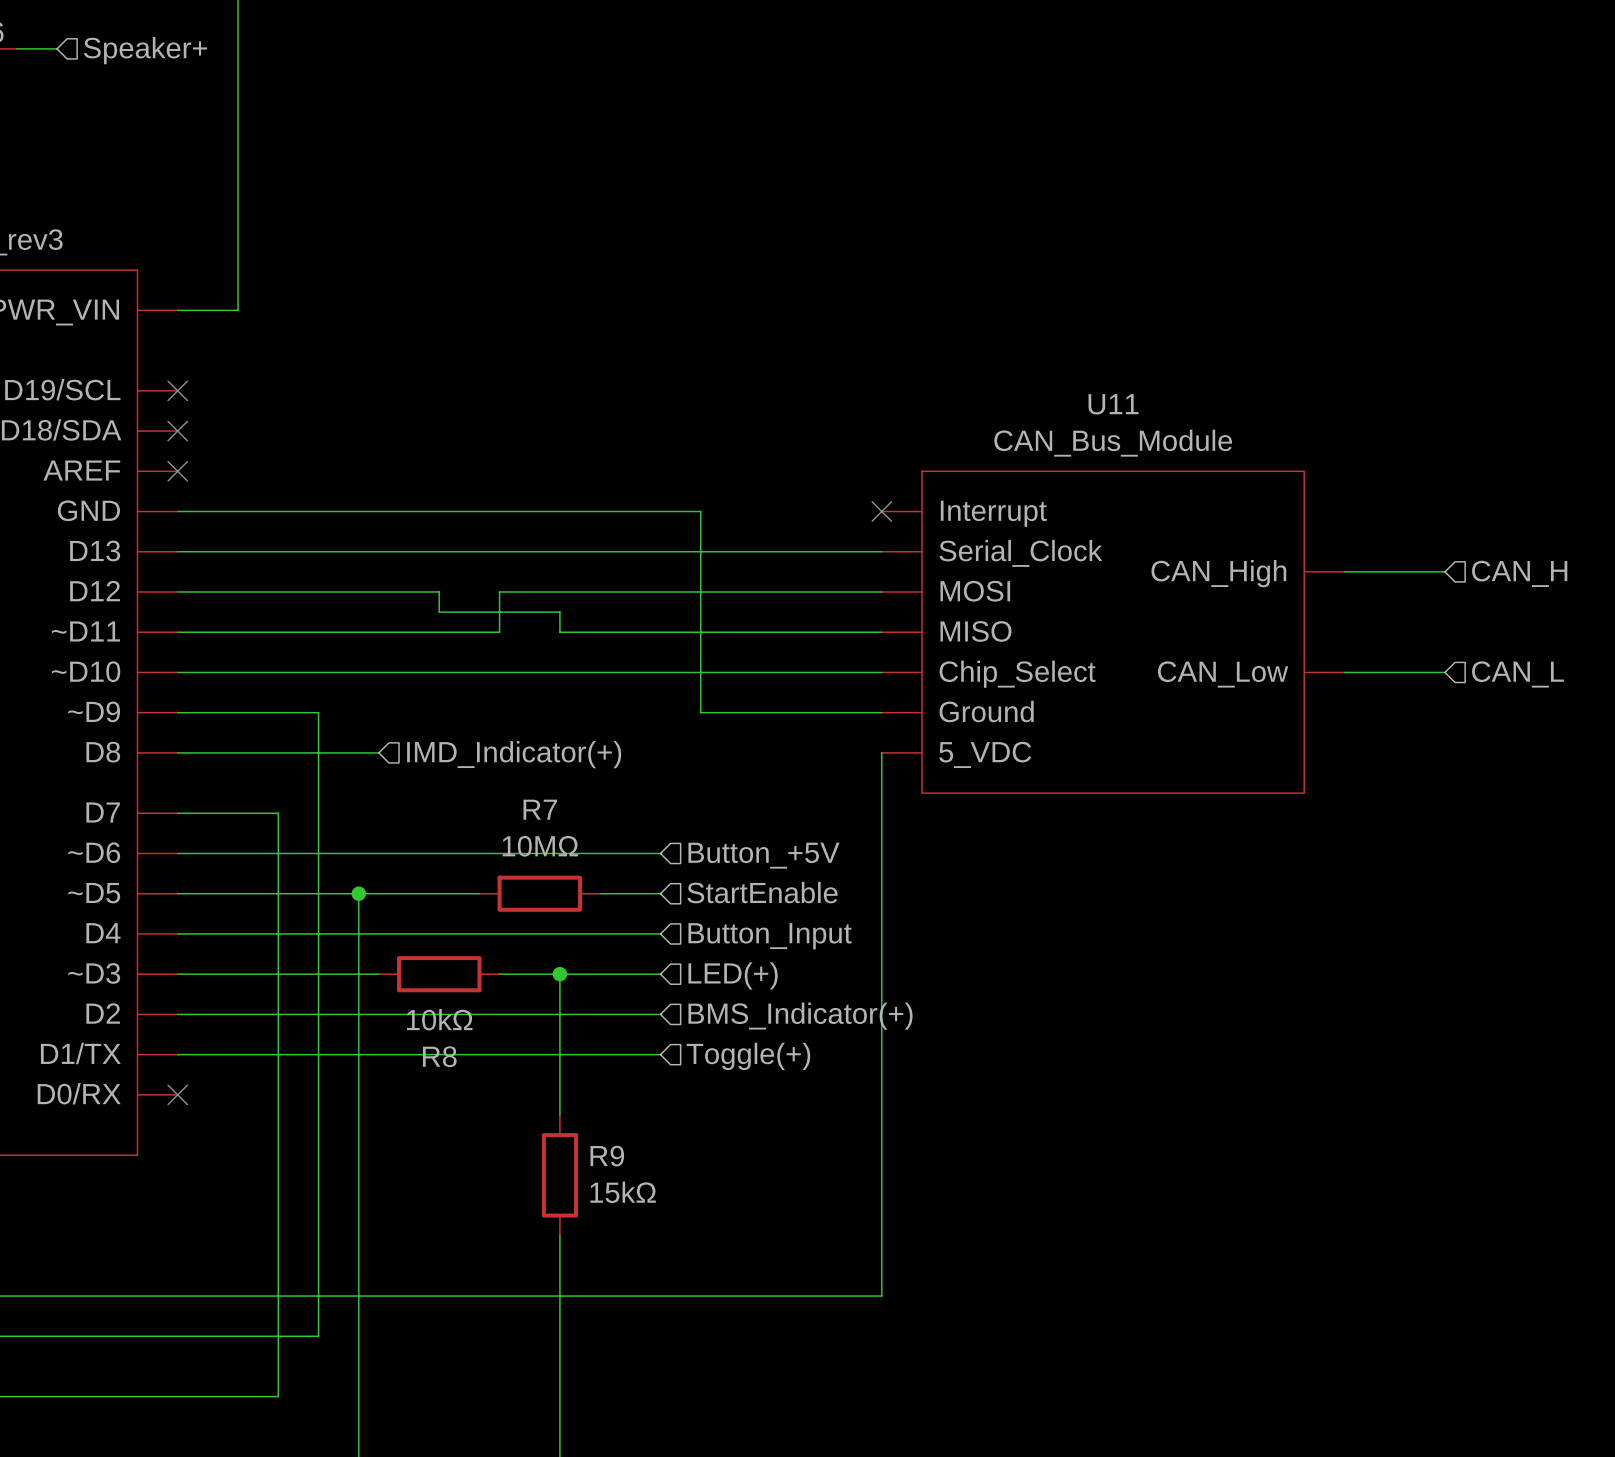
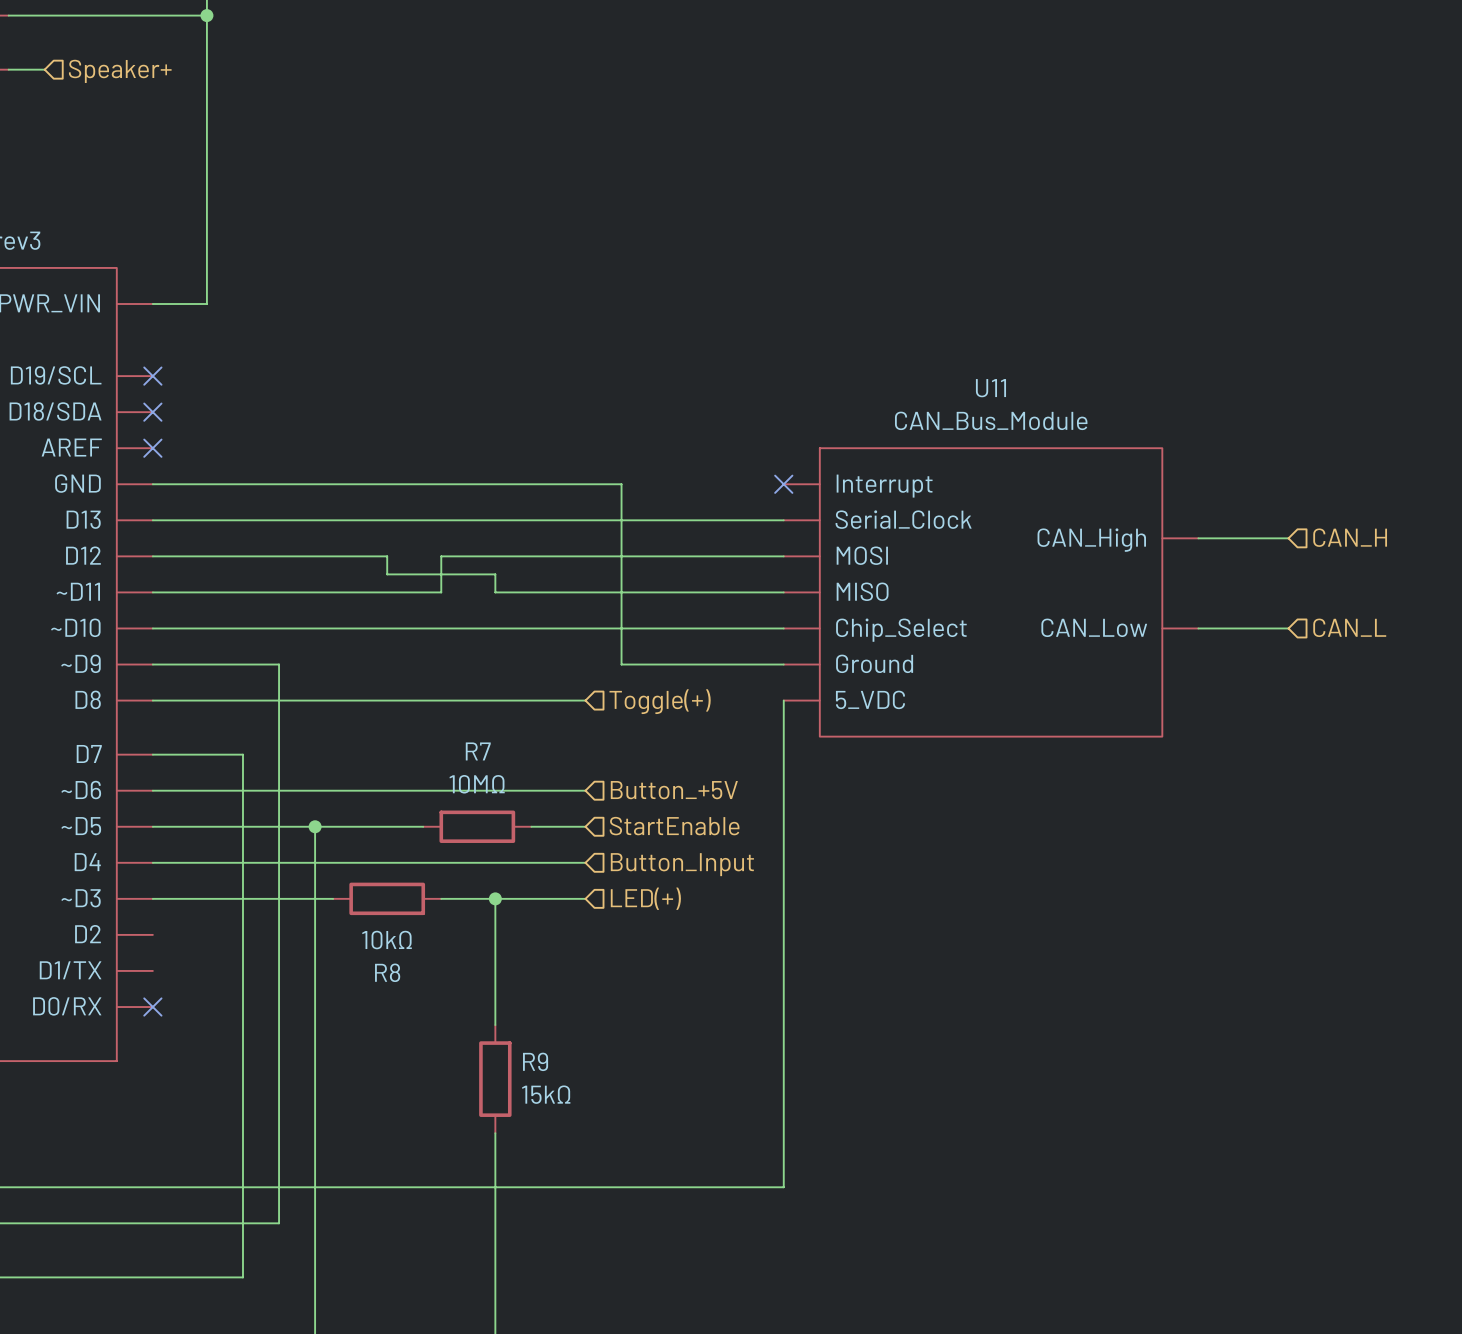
wire: none -> (333, 700) (585, 700)
hierarchical label: IMD_Indicator(+) (514, 754) -> none
wire: (177, 1014) (660, 1014) -> none
hierarchical label: BMS_Indicator(+) (800, 1016) -> none
wire: (177, 1054) (660, 1054) -> none
hierarchical label position: Toggle(+) (748, 1056) -> Toggle(+) (660, 701)

